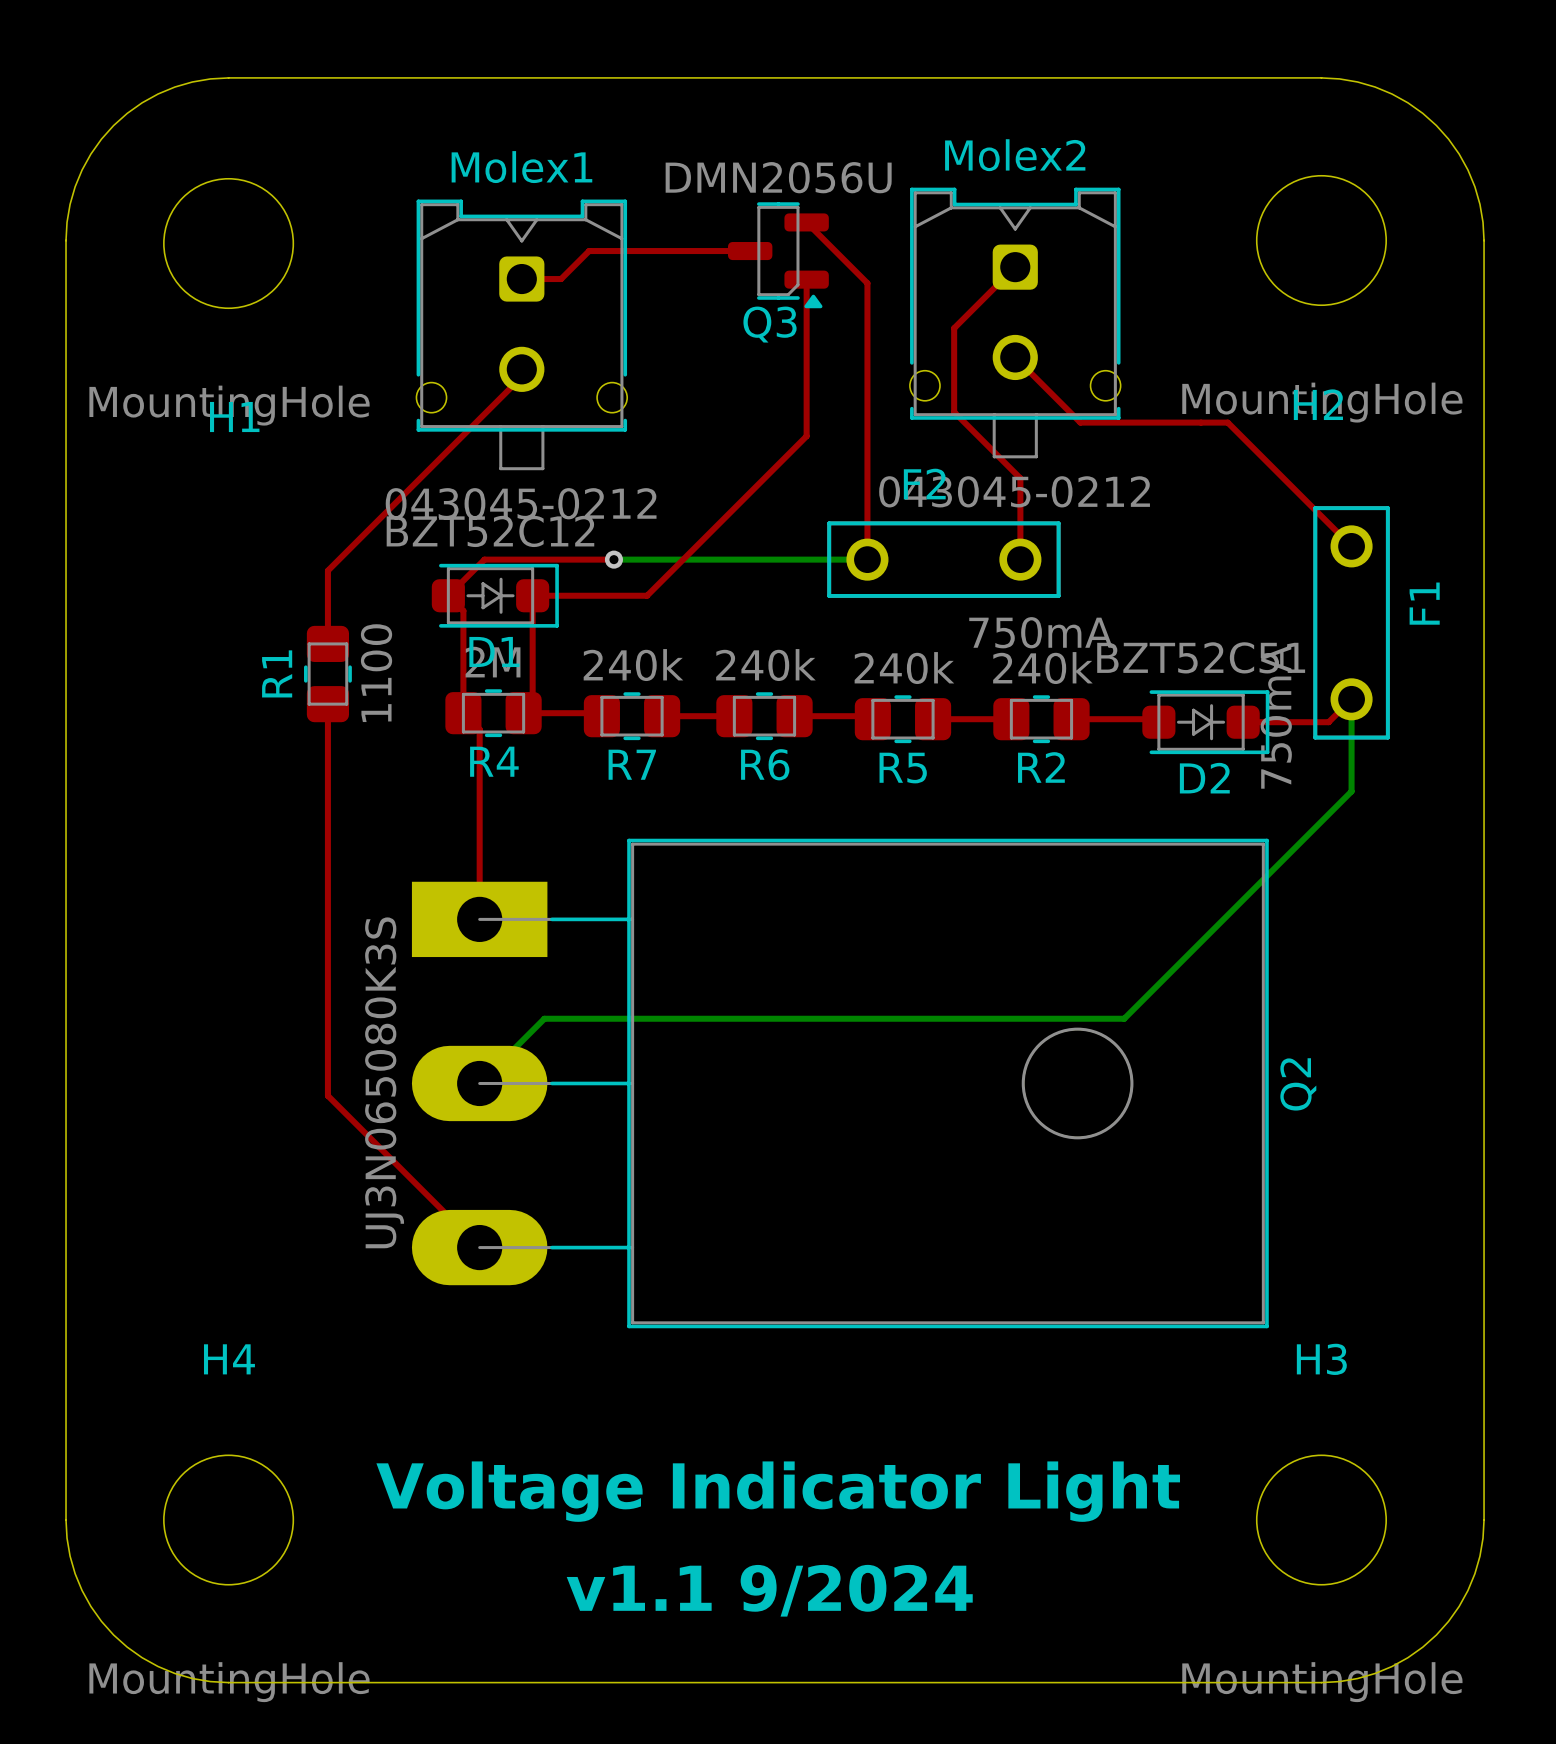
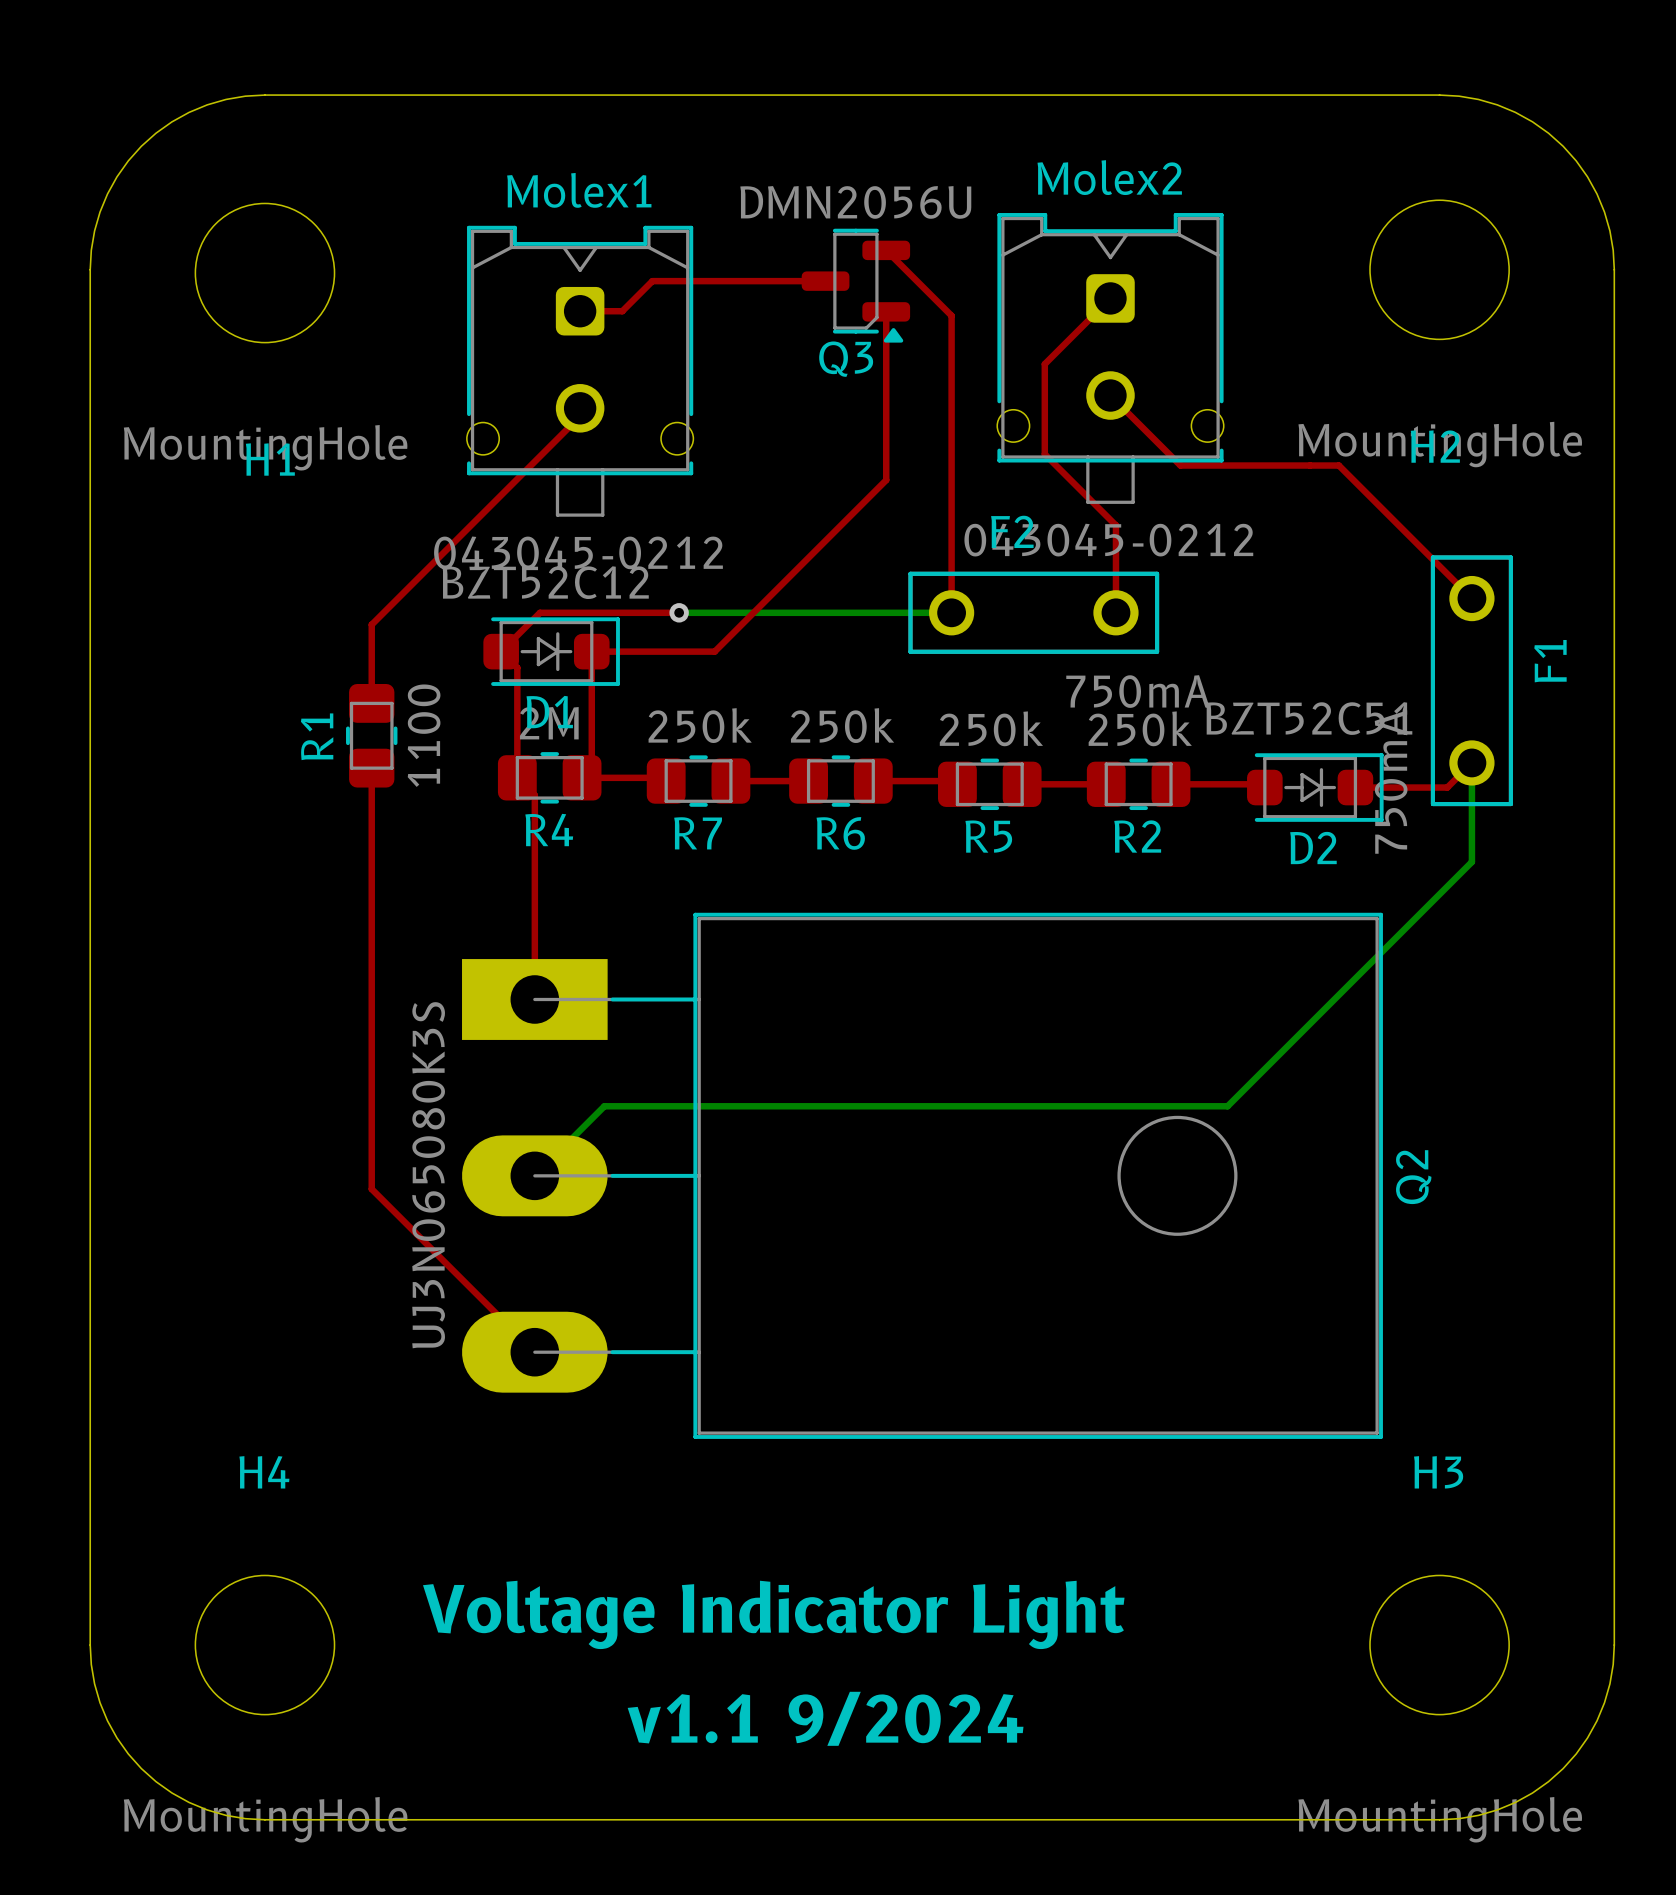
R7 value: 240k (633, 665) -> 250k (700, 725)
R6 value: 240k (765, 665) -> 250k (842, 725)
R5 value: 240k (904, 668) -> 250k (991, 728)
R2 value: 240k (1042, 668) -> 250k (1140, 728)

